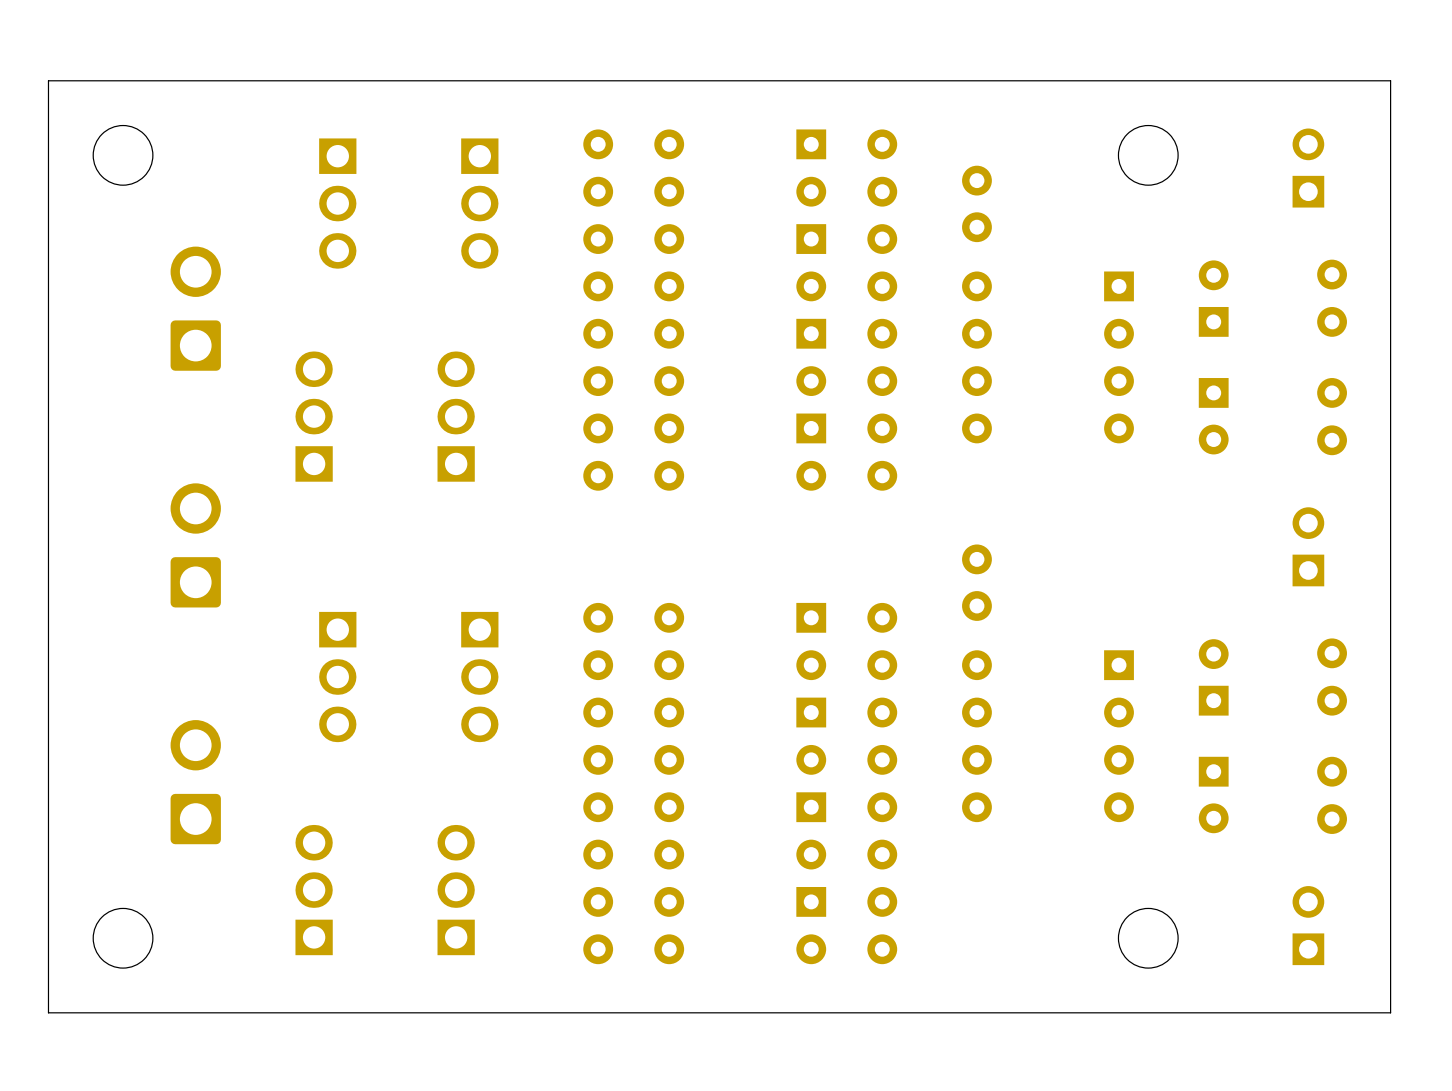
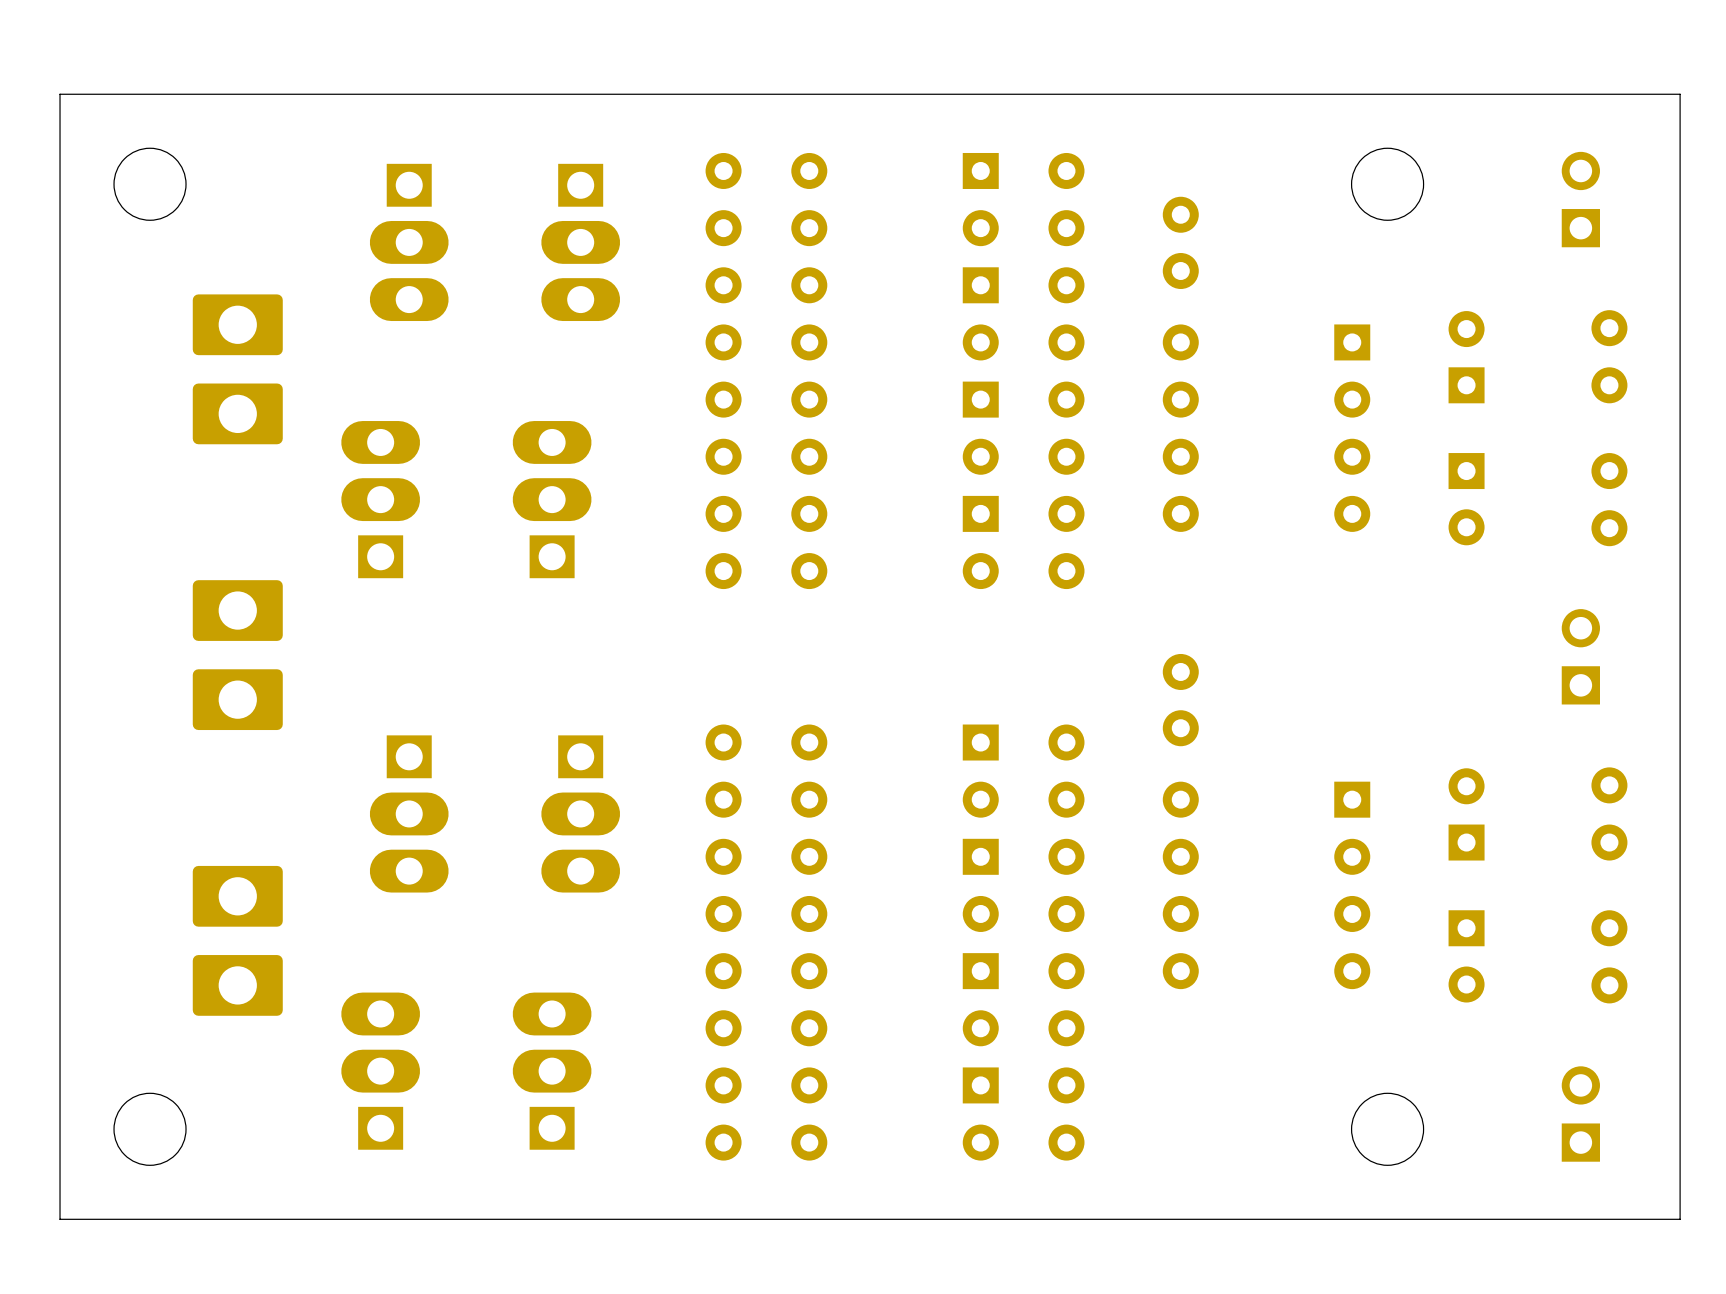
part footprint: [319, 138, 357, 269] -> [369, 163, 449, 322]
part footprint: [461, 138, 499, 269] -> [541, 163, 621, 322]
part footprint: [170, 246, 221, 371] -> [192, 294, 283, 445]
part footprint: [295, 351, 333, 482] -> [341, 421, 421, 579]
part footprint: [437, 351, 475, 482] -> [512, 421, 592, 579]
part footprint: [170, 483, 221, 608] -> [192, 580, 283, 731]
part footprint: [319, 611, 357, 743] -> [369, 735, 449, 893]
part footprint: [461, 611, 499, 743] -> [541, 735, 621, 893]
part footprint: [170, 720, 221, 845] -> [192, 865, 283, 1016]
part footprint: [295, 824, 333, 956] -> [341, 992, 421, 1150]
part footprint: [437, 824, 475, 956] -> [512, 992, 592, 1150]

